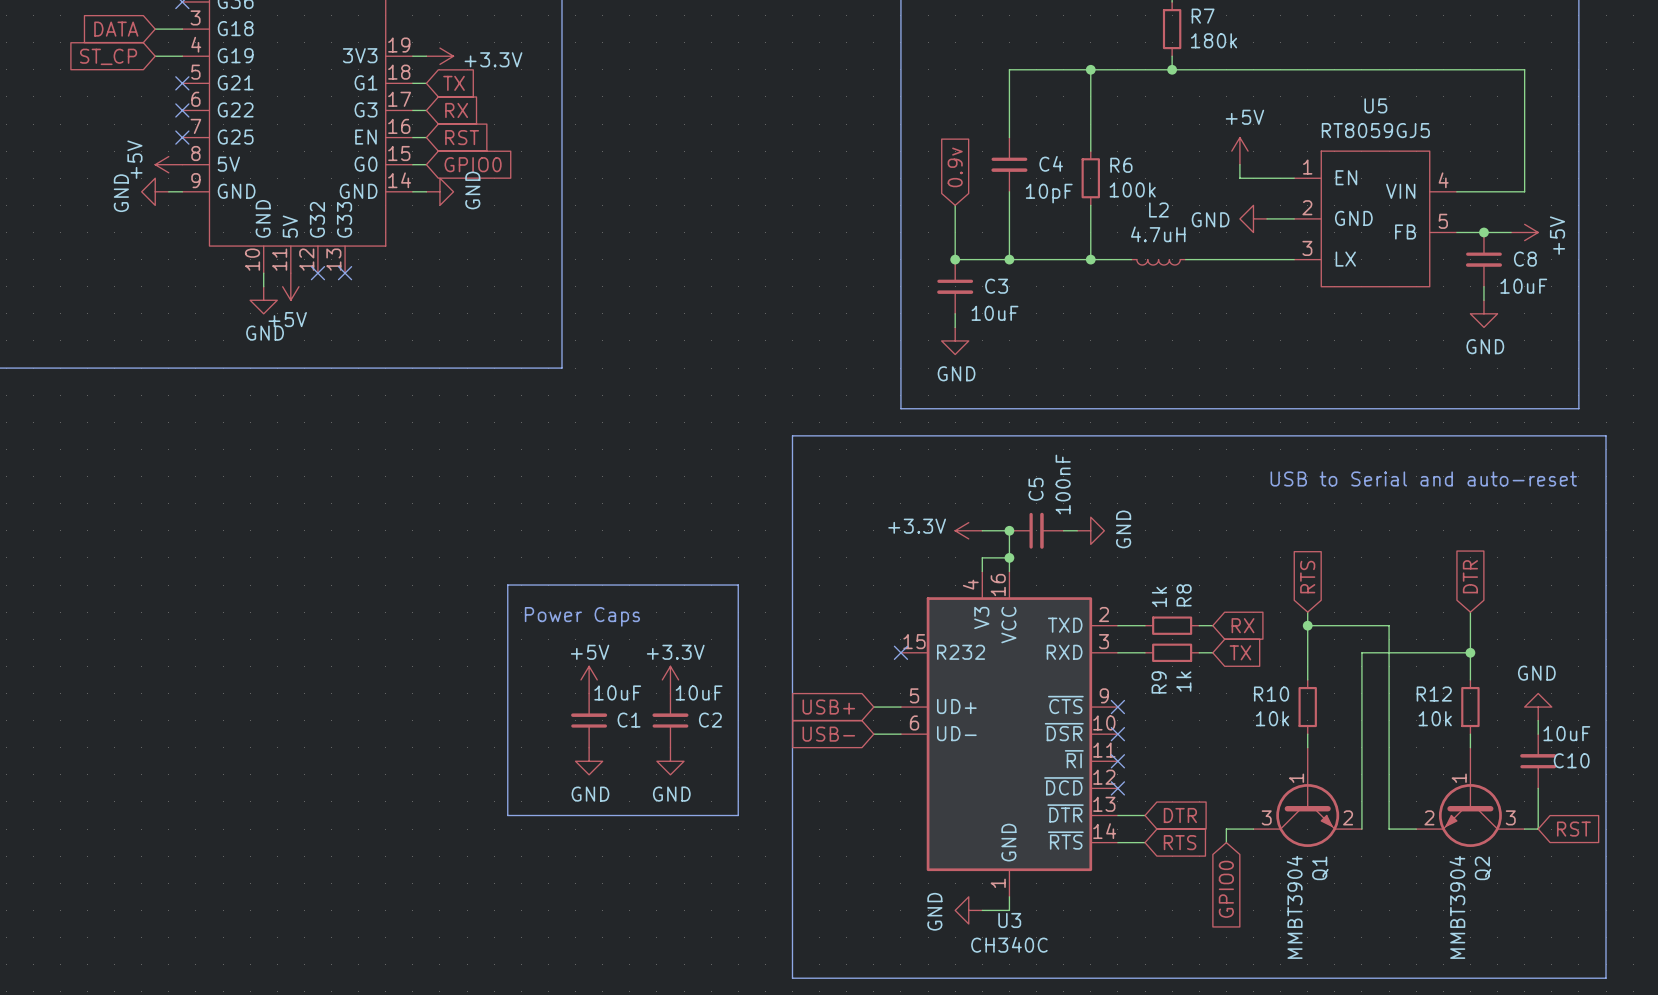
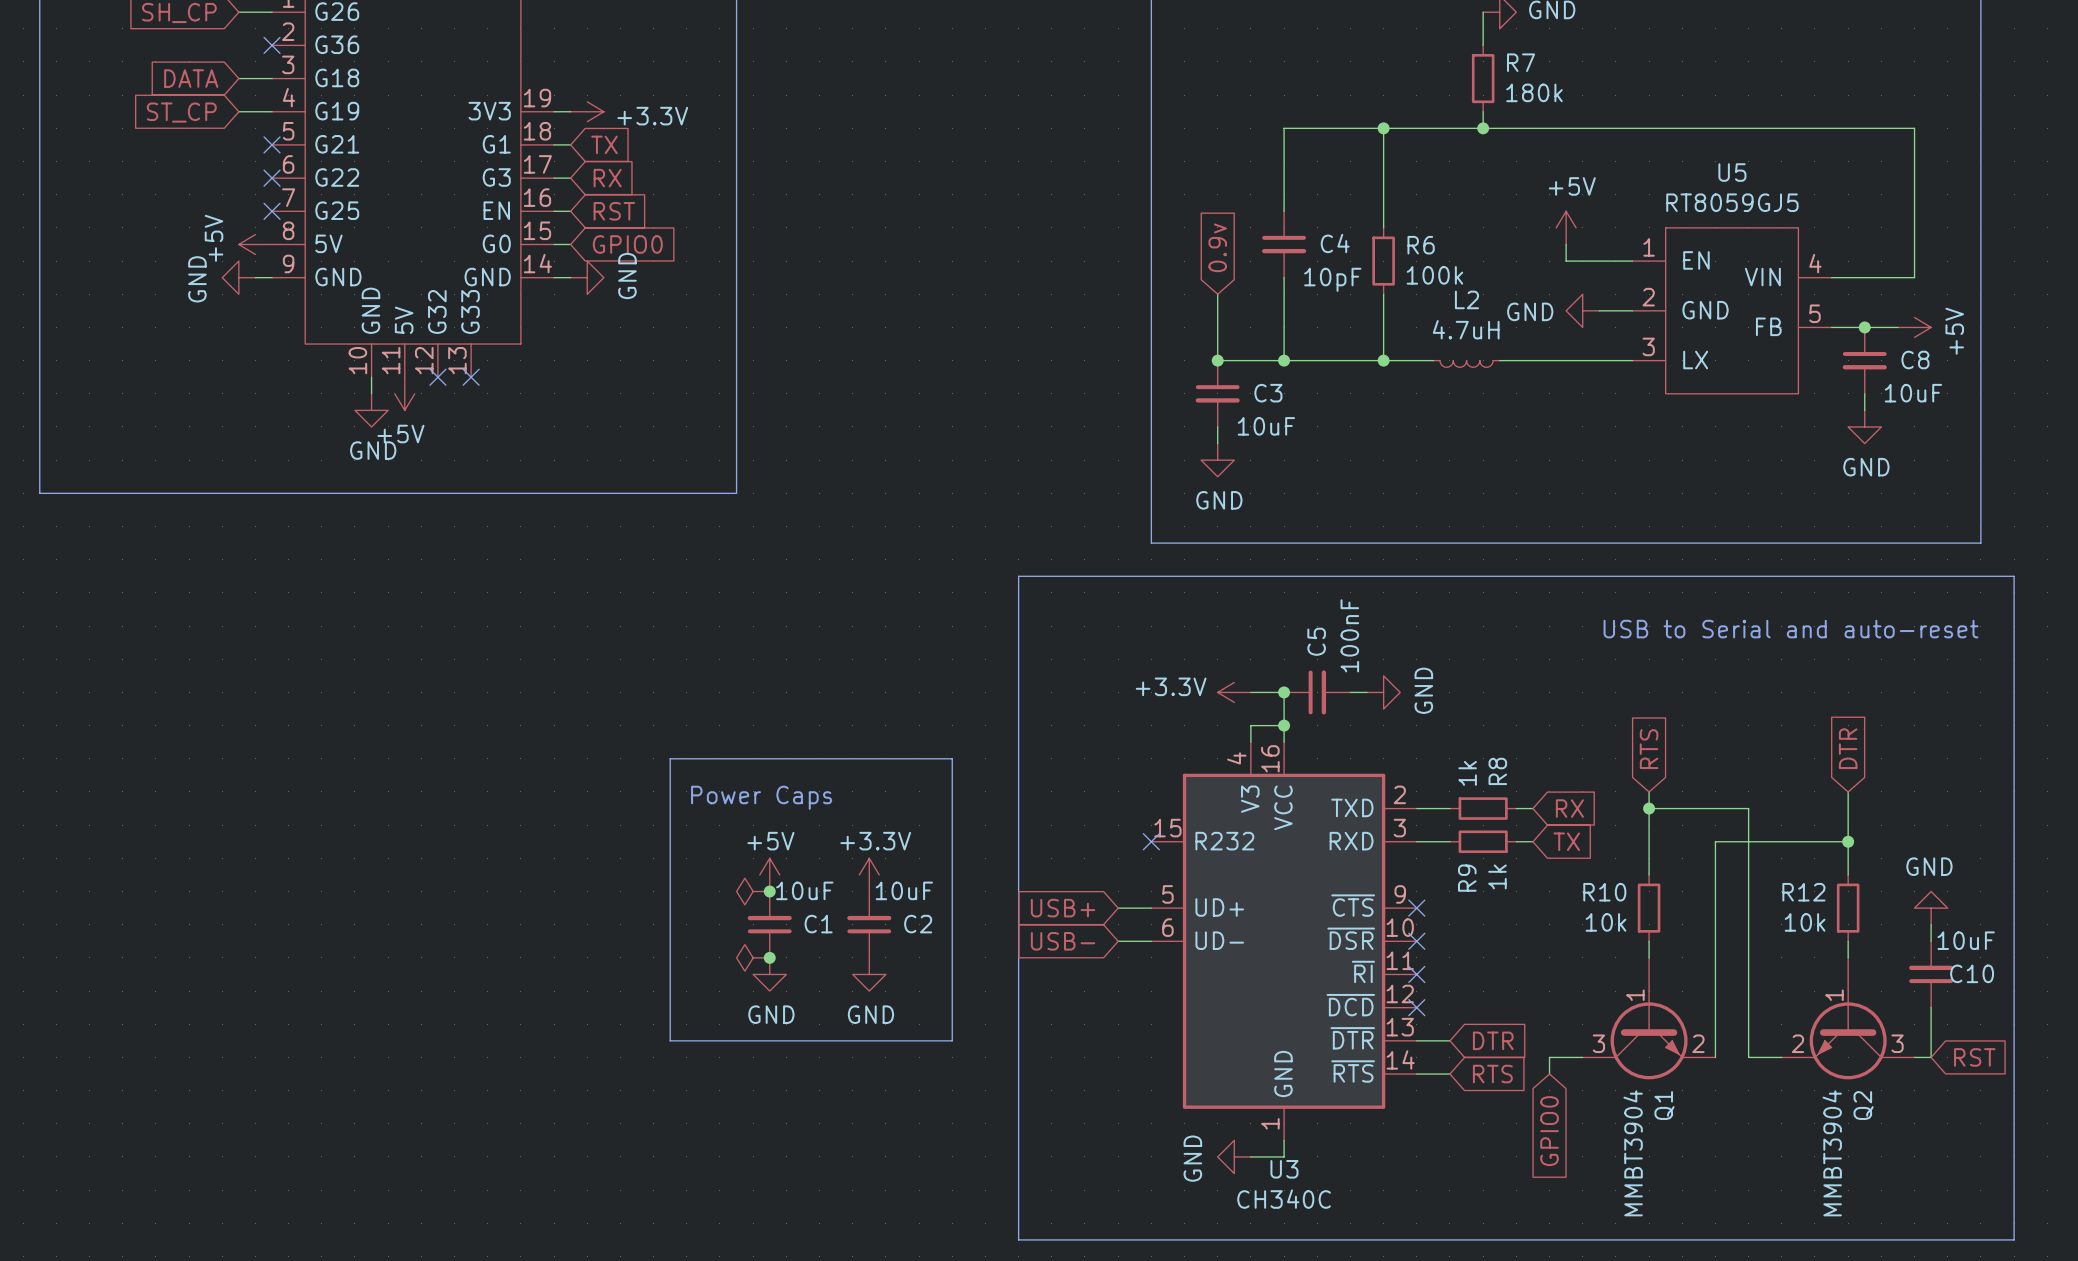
power symbol: none -> (753, 891)
junction: none -> (769, 891)
power symbol: none -> (753, 957)
junction: none -> (769, 957)

